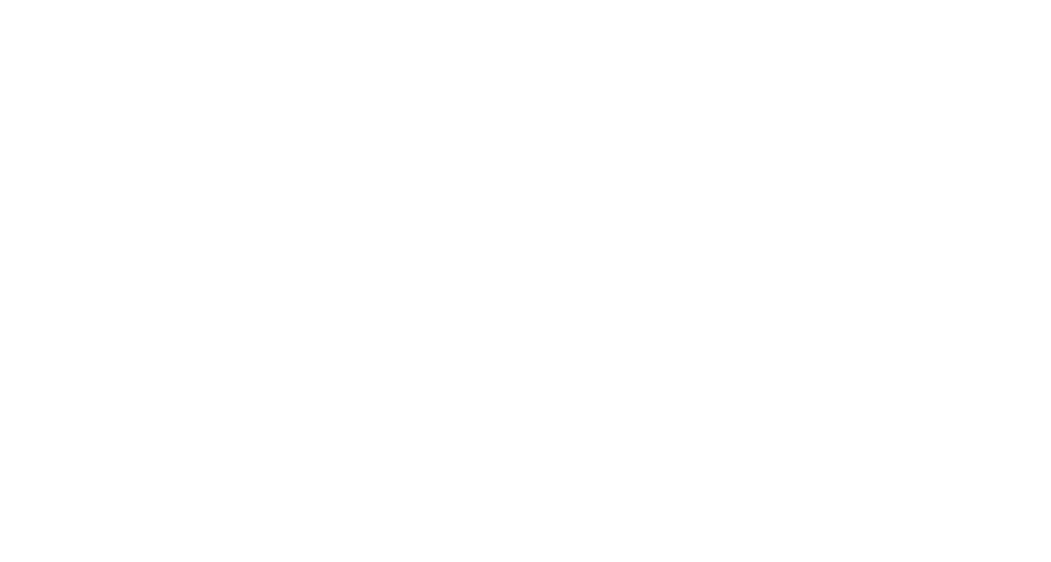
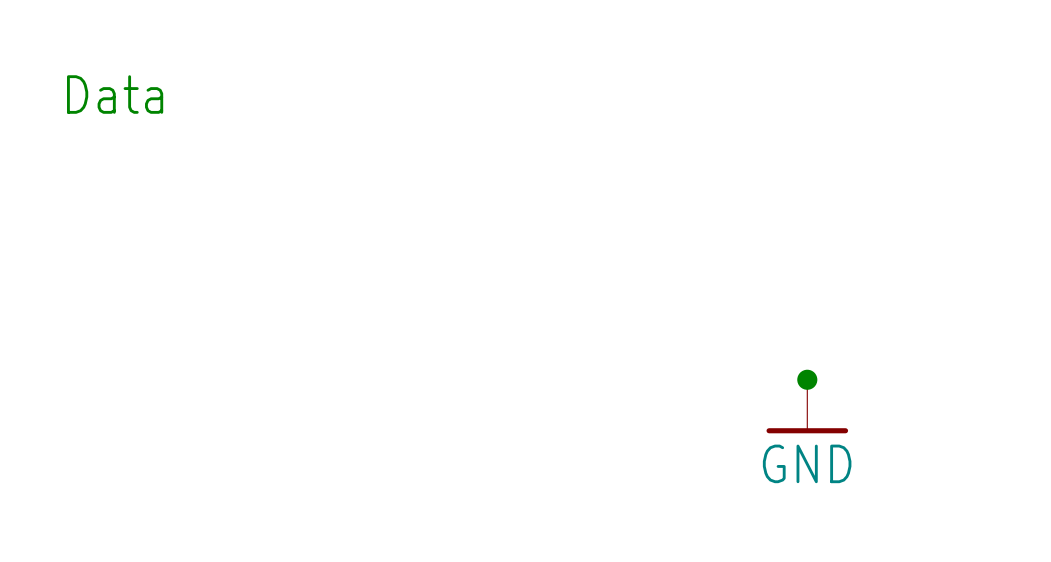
text: none -> Data (115, 94)
junction: none -> (807, 379)
power symbol: none -> GND (807, 406)

